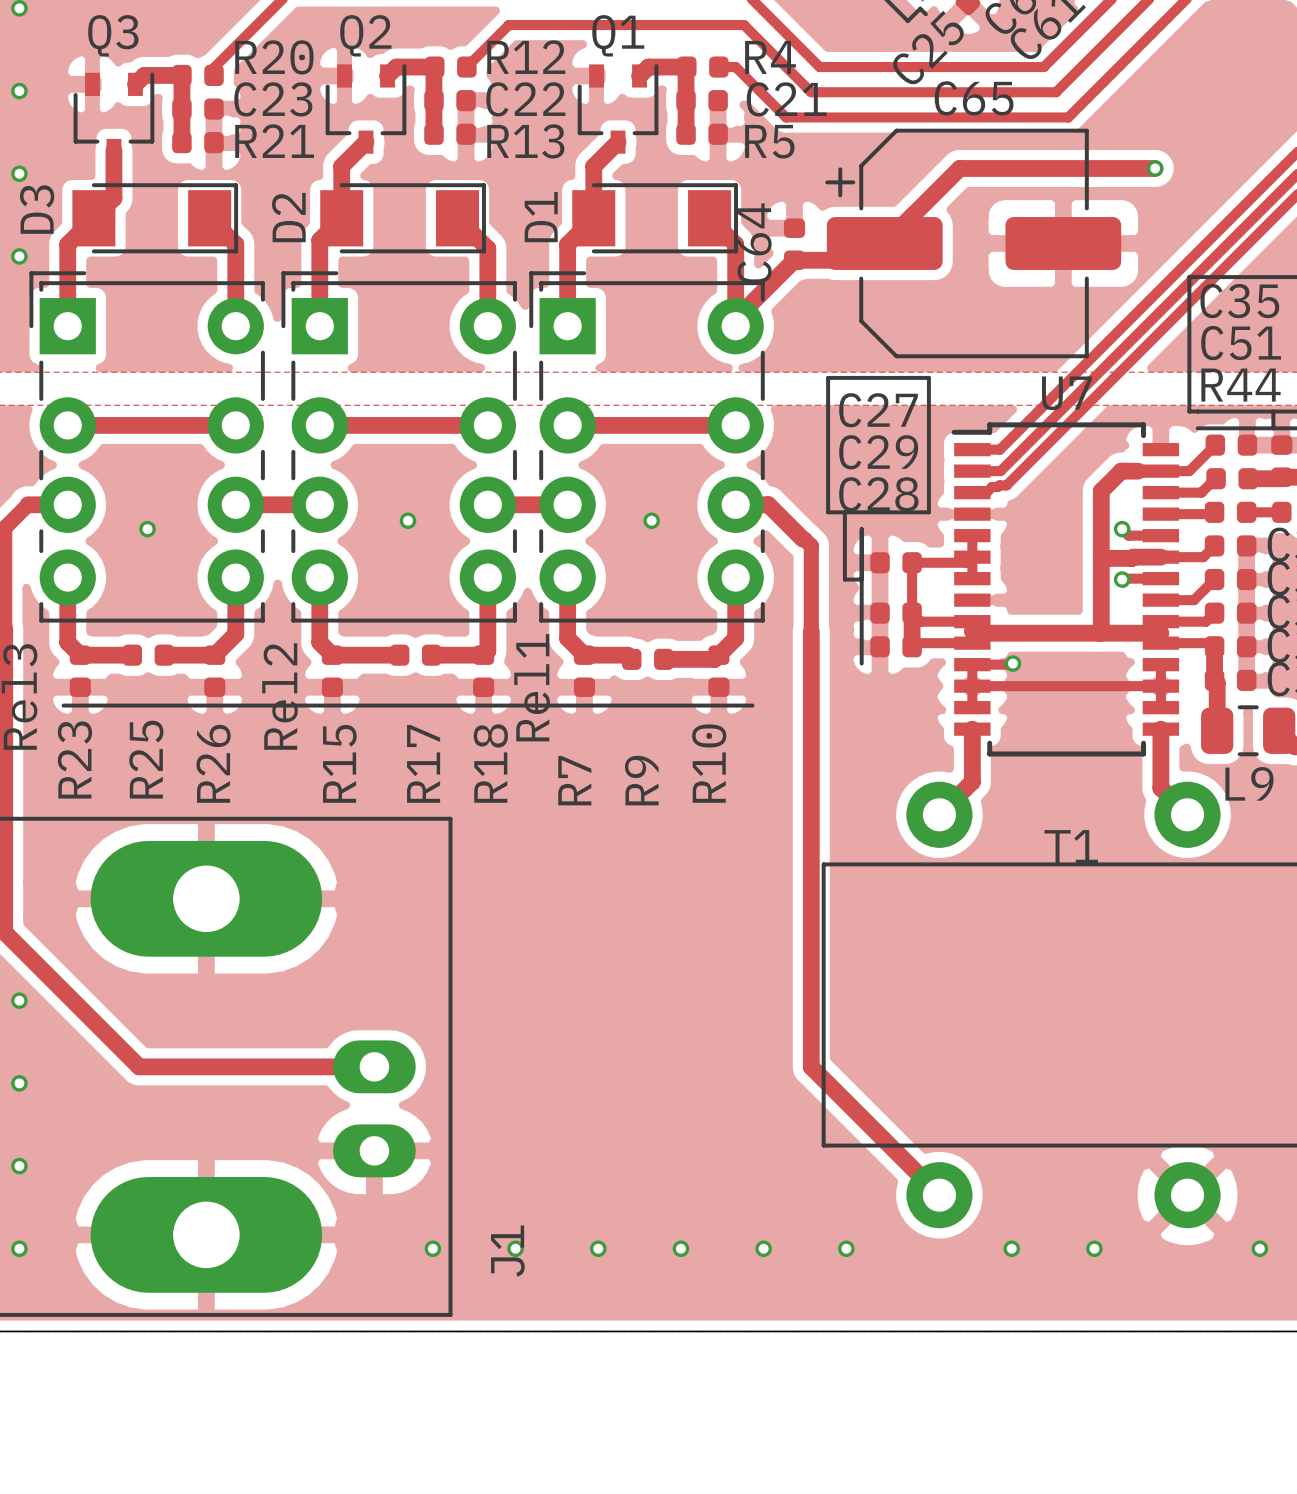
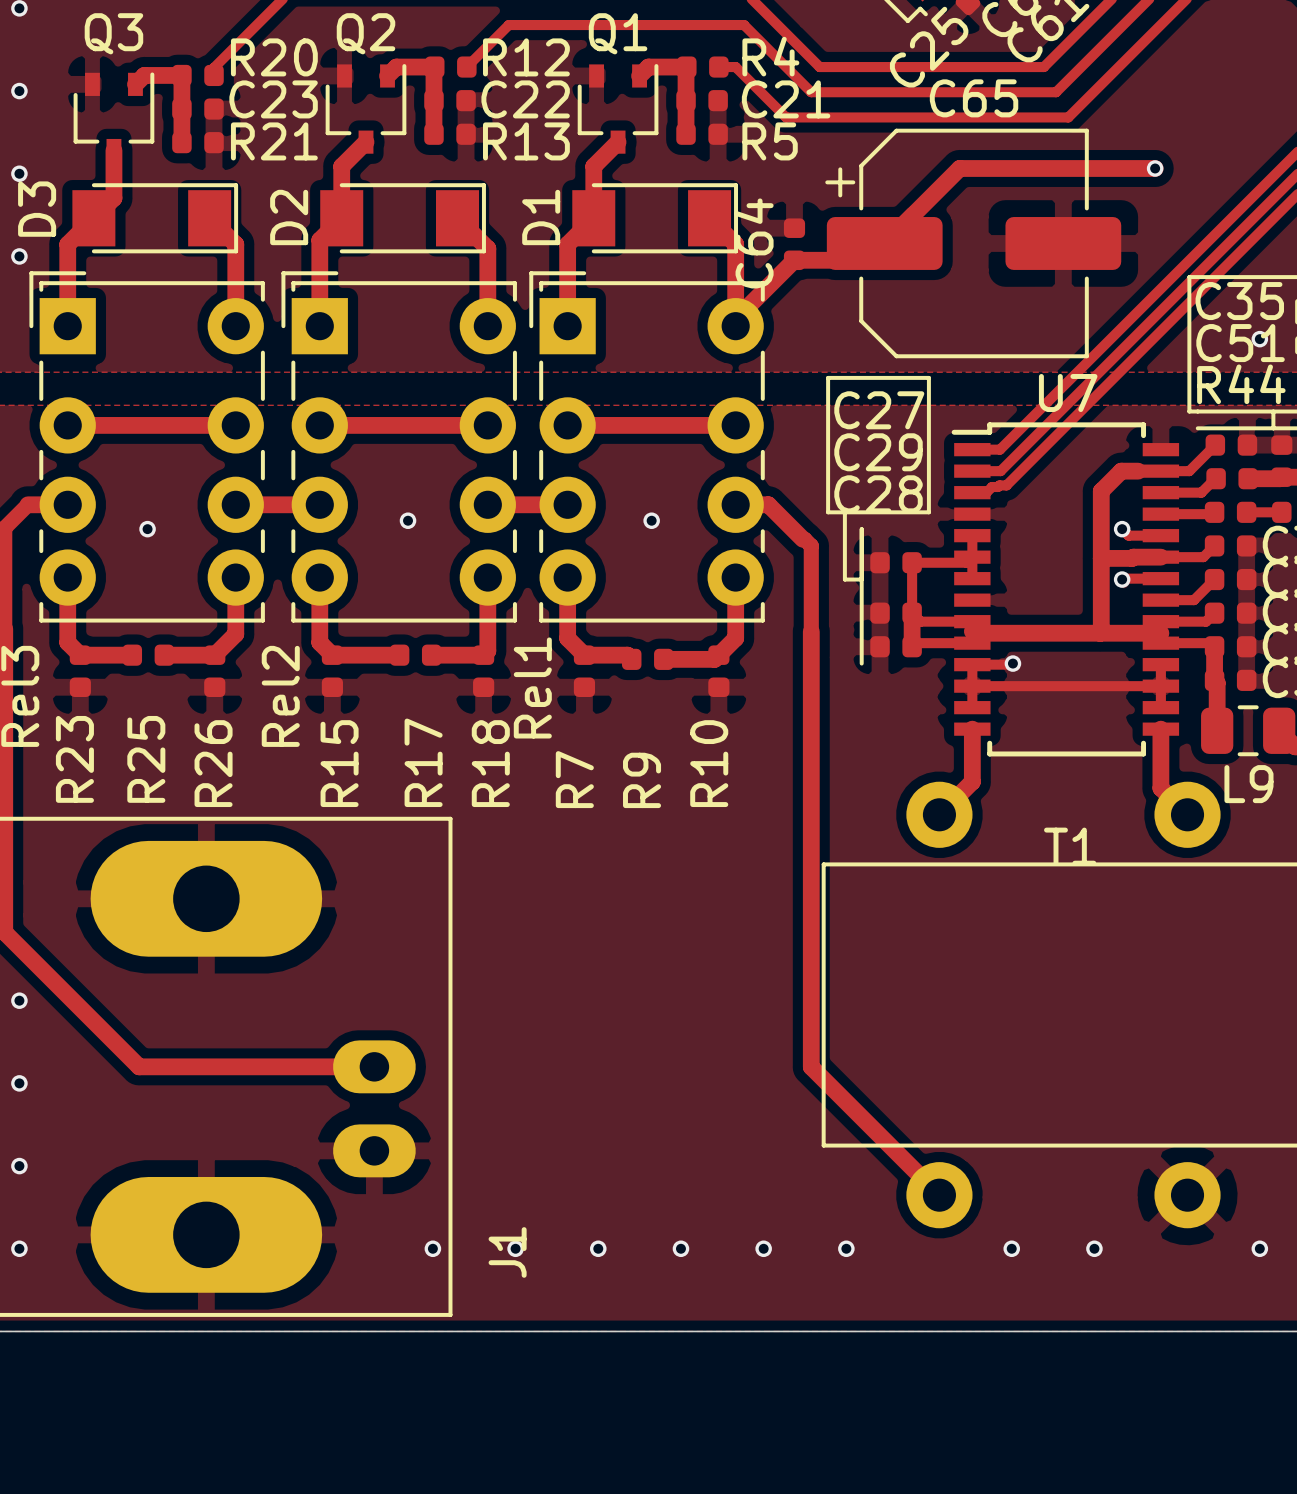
via: none -> (1259, 339)
line: (63, 705) (752, 705) -> none

